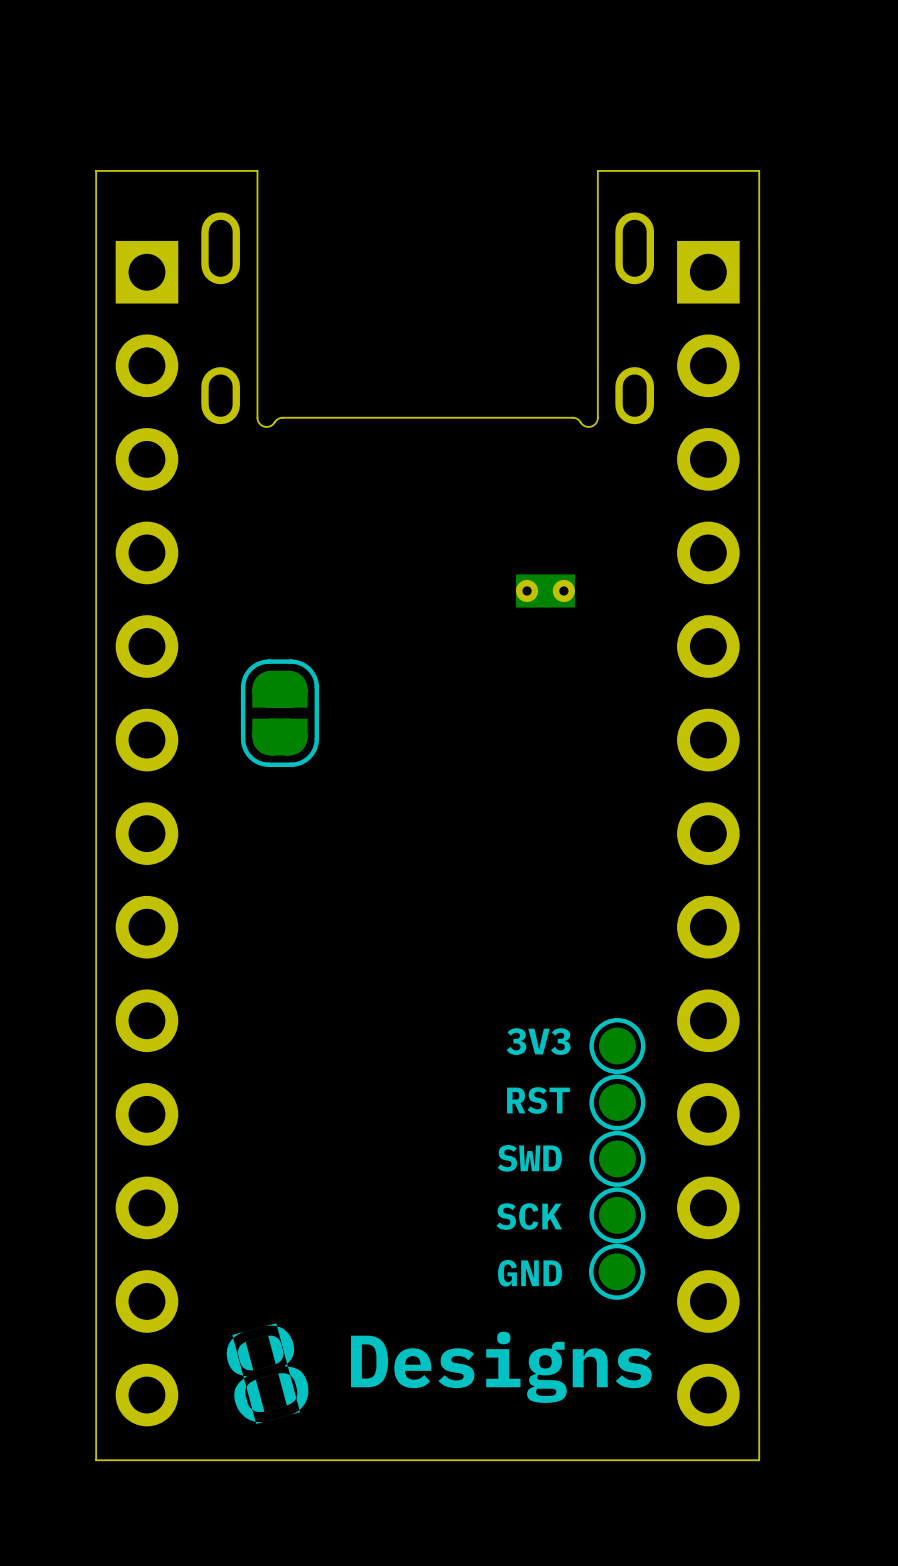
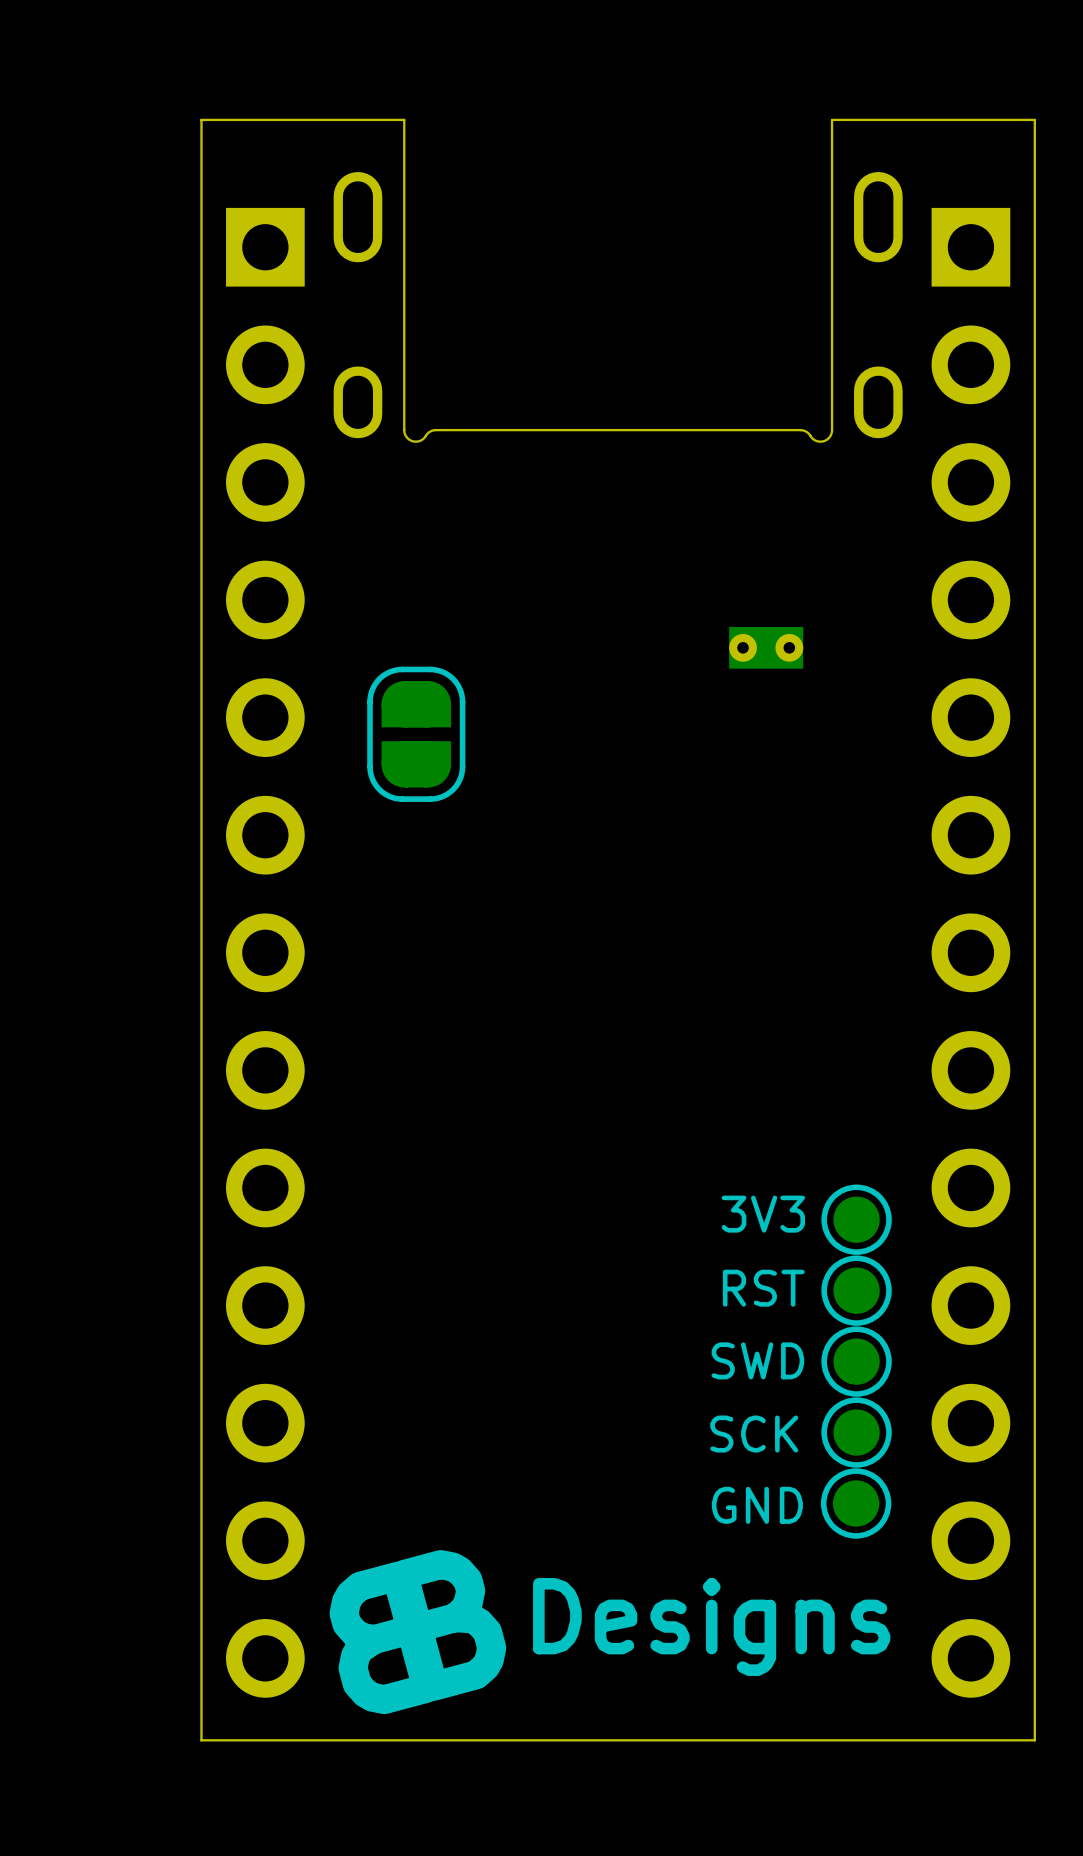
part position: (279, 713) -> (416, 734)

